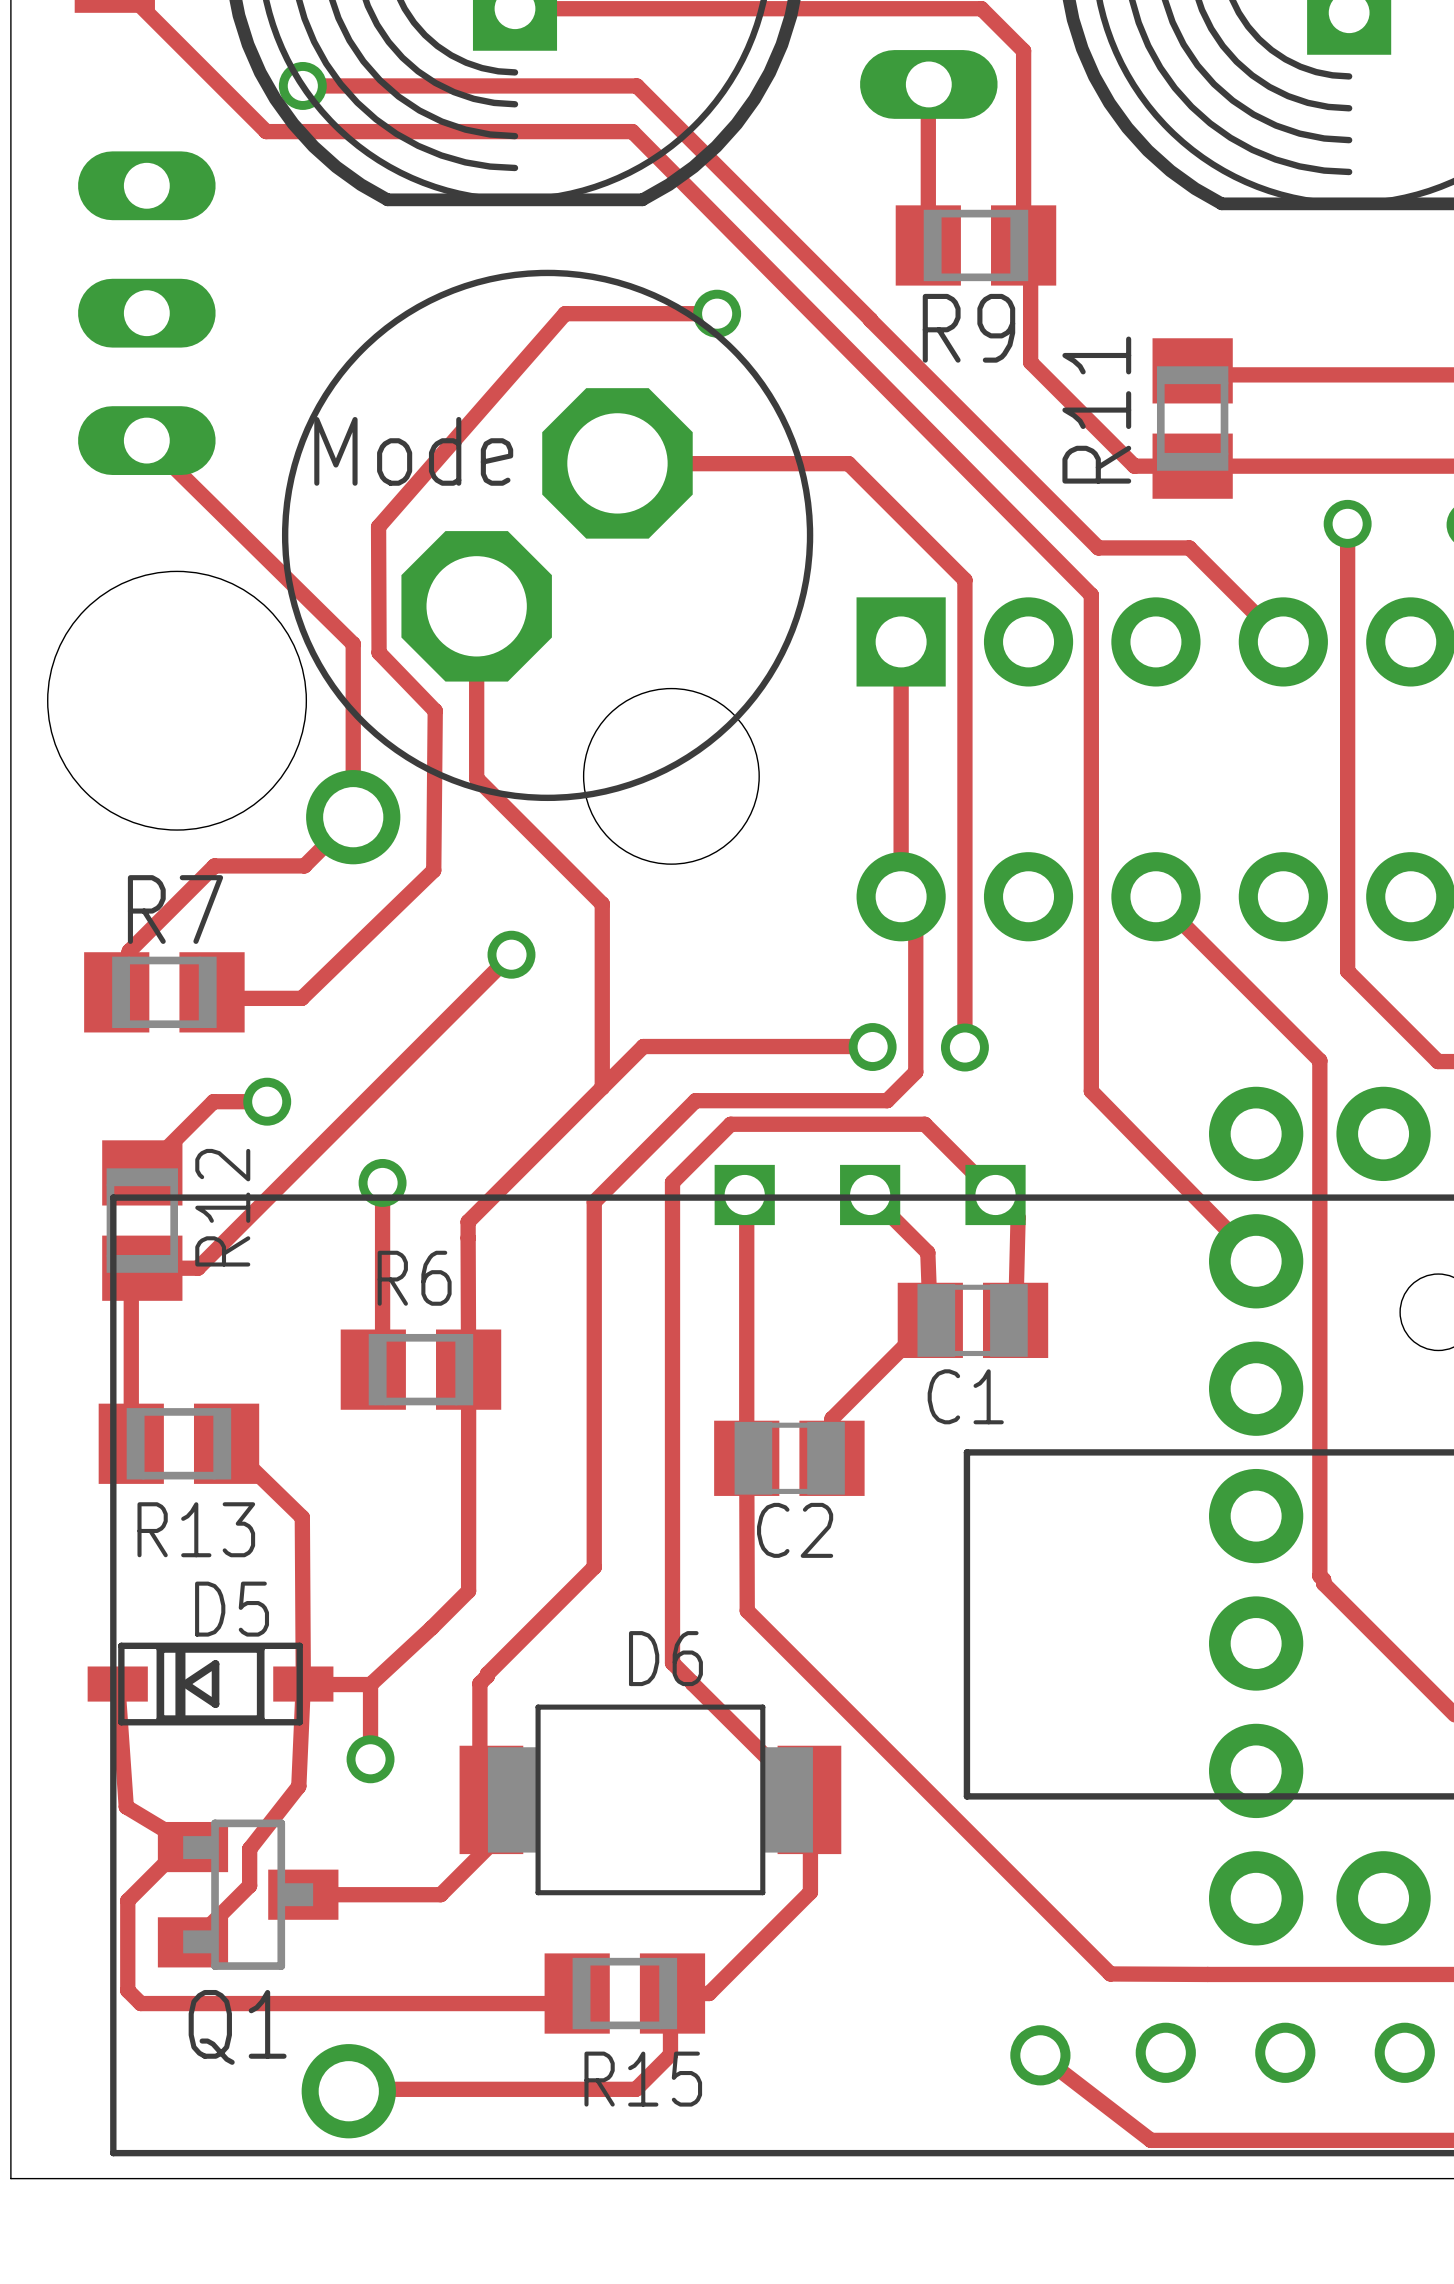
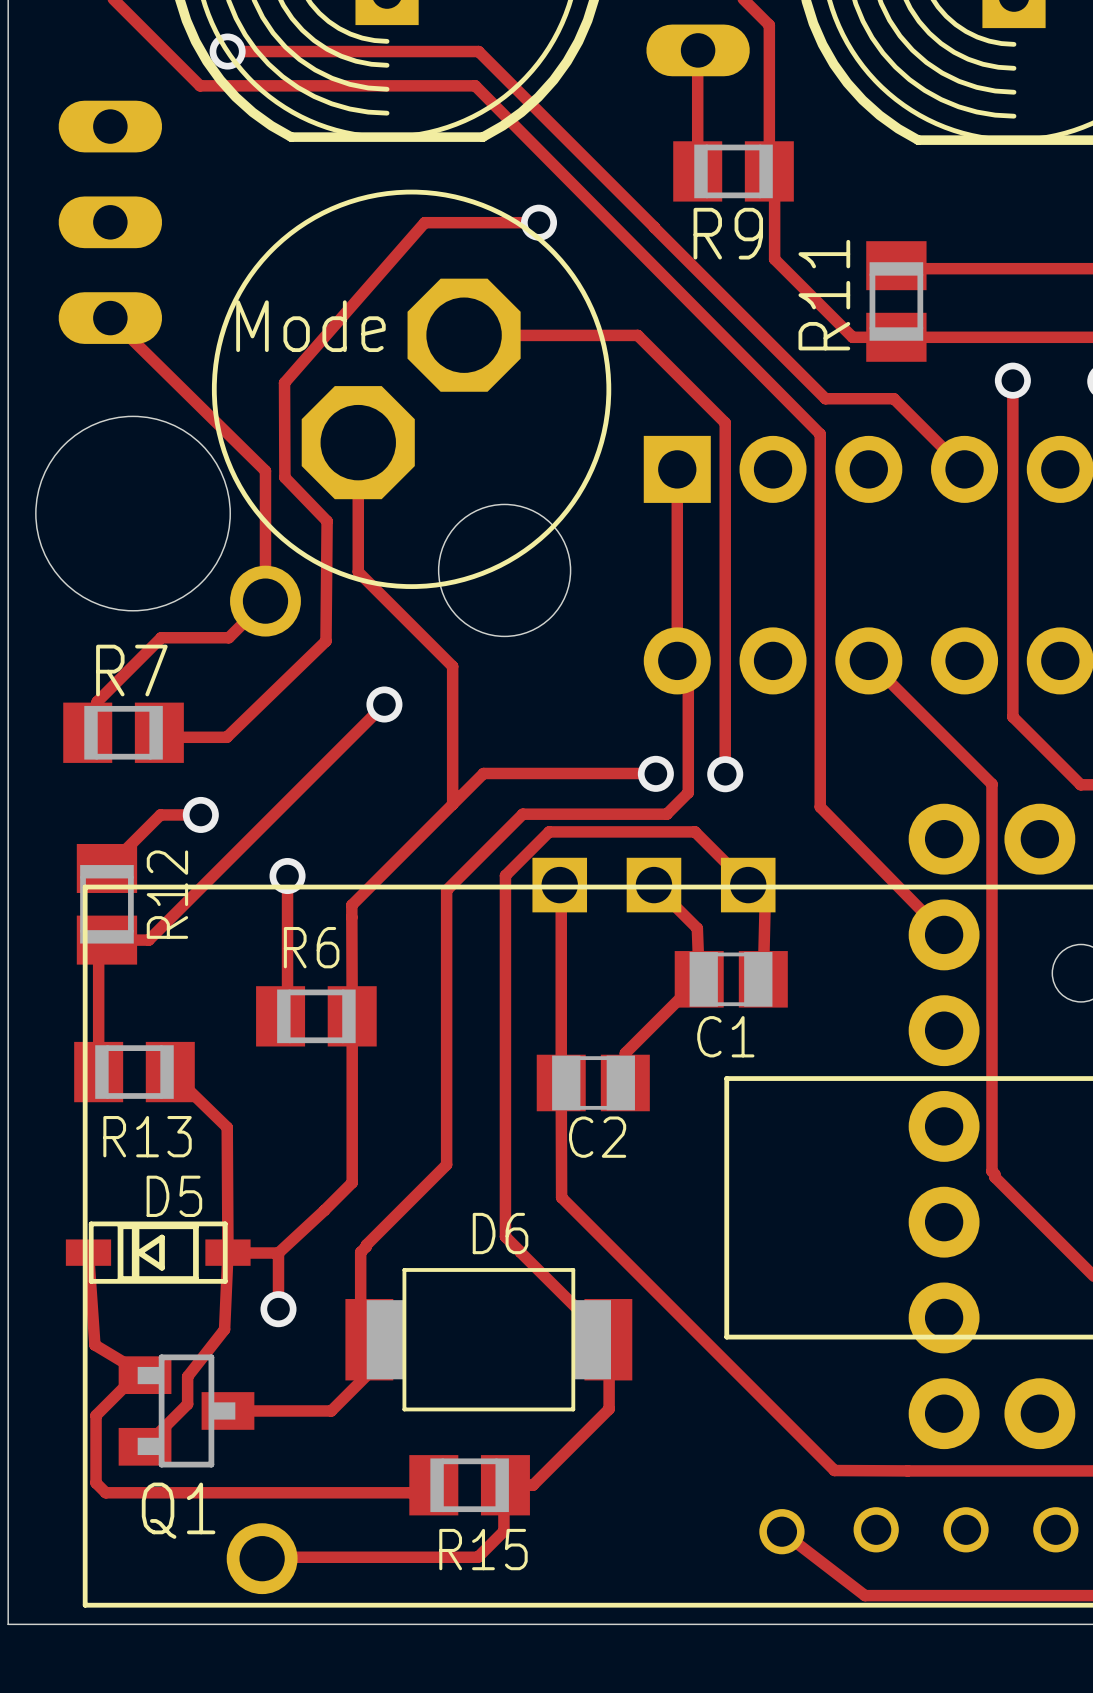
part footprint: [714, 1164, 1026, 1226] -> [532, 857, 776, 913]

